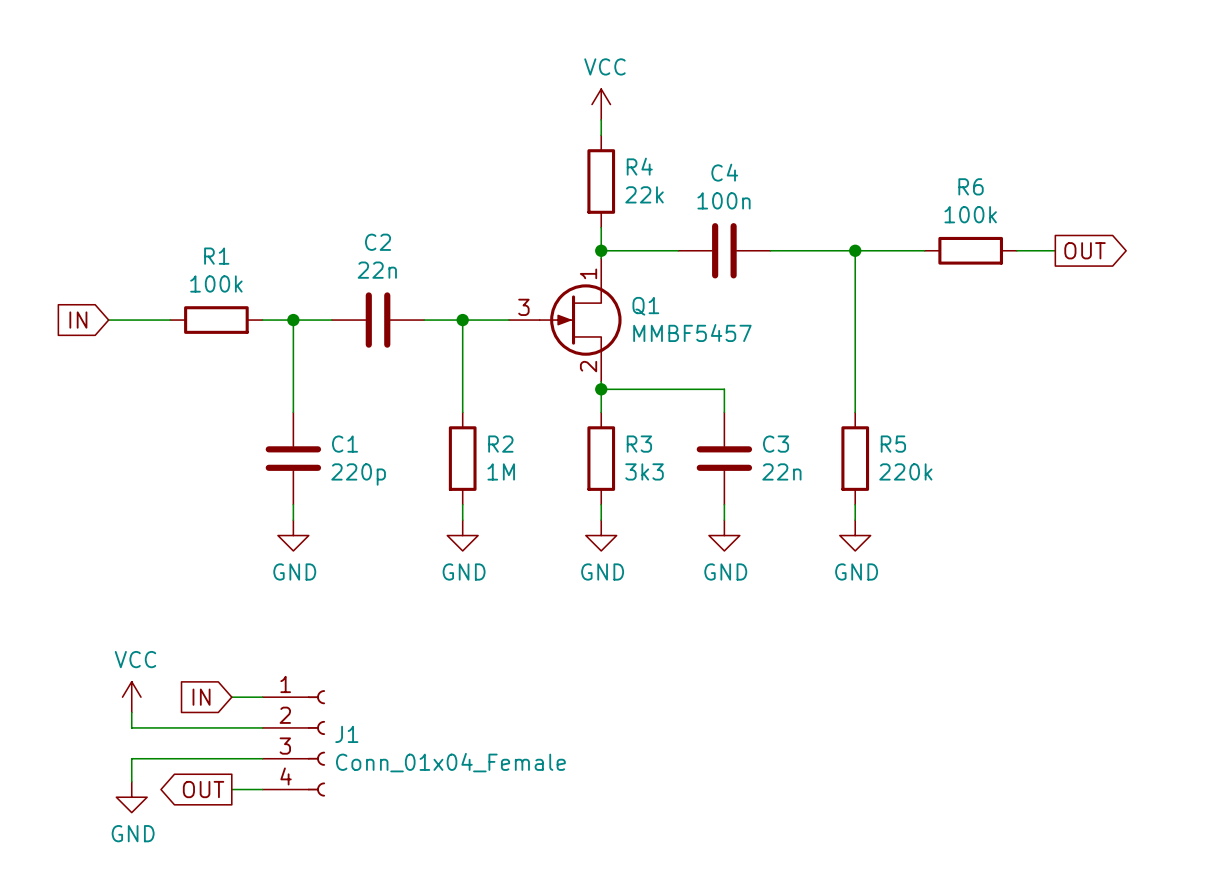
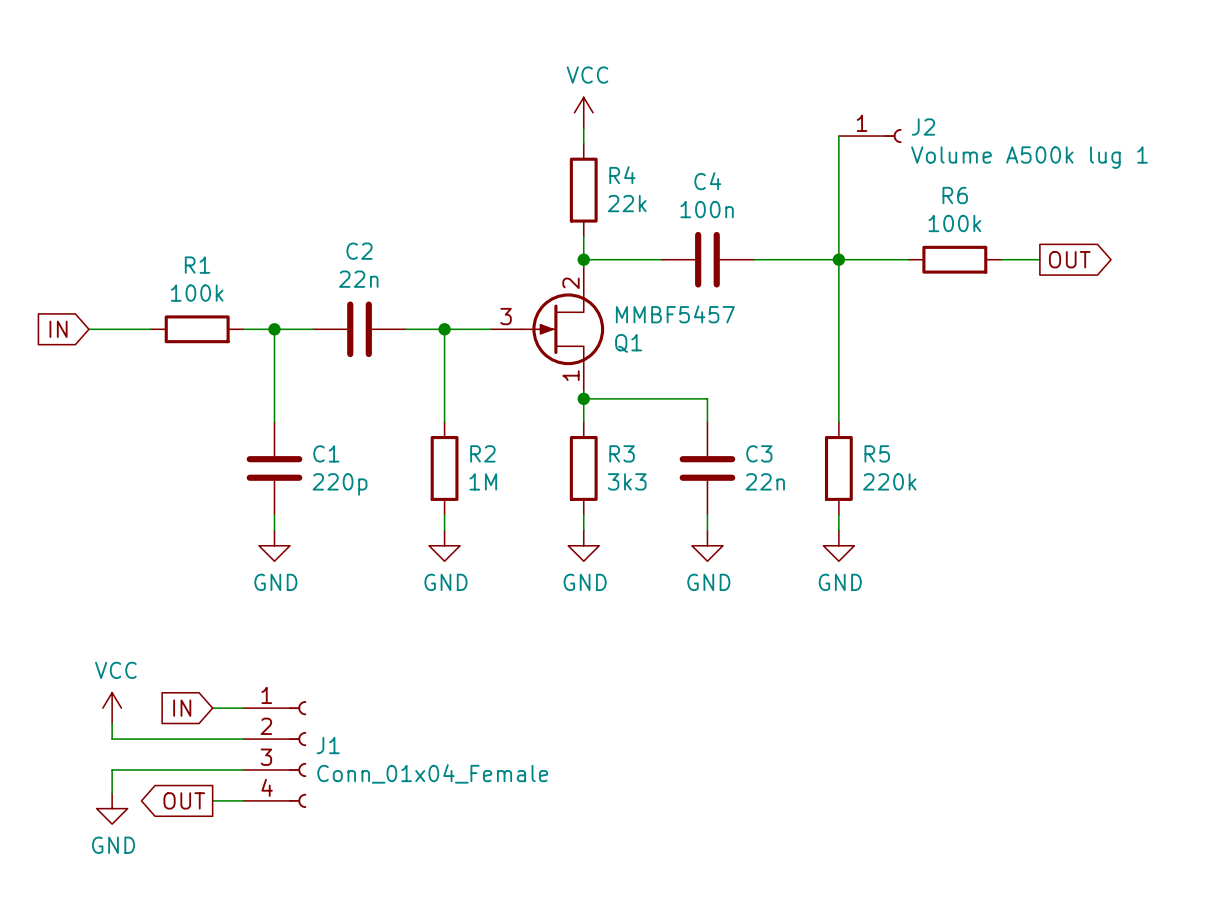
wire: none -> (838, 136) (838, 259)
J2: none -> Volume A500k lug 1 (870, 136)
Q1 flip: as is (580, 320) -> up-down (563, 329)

